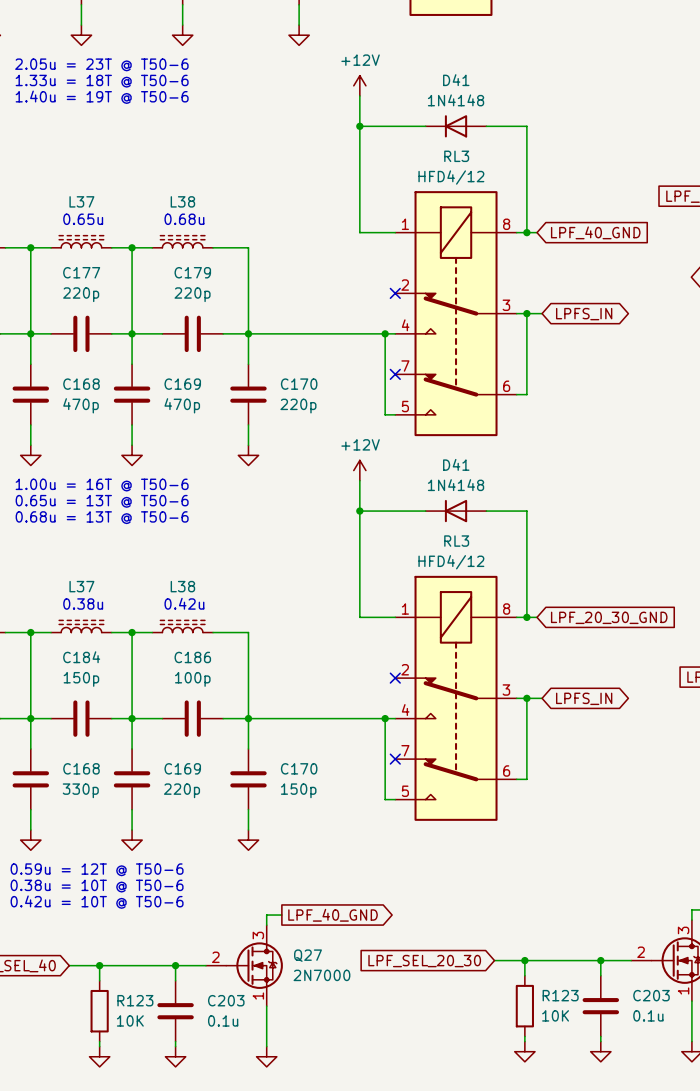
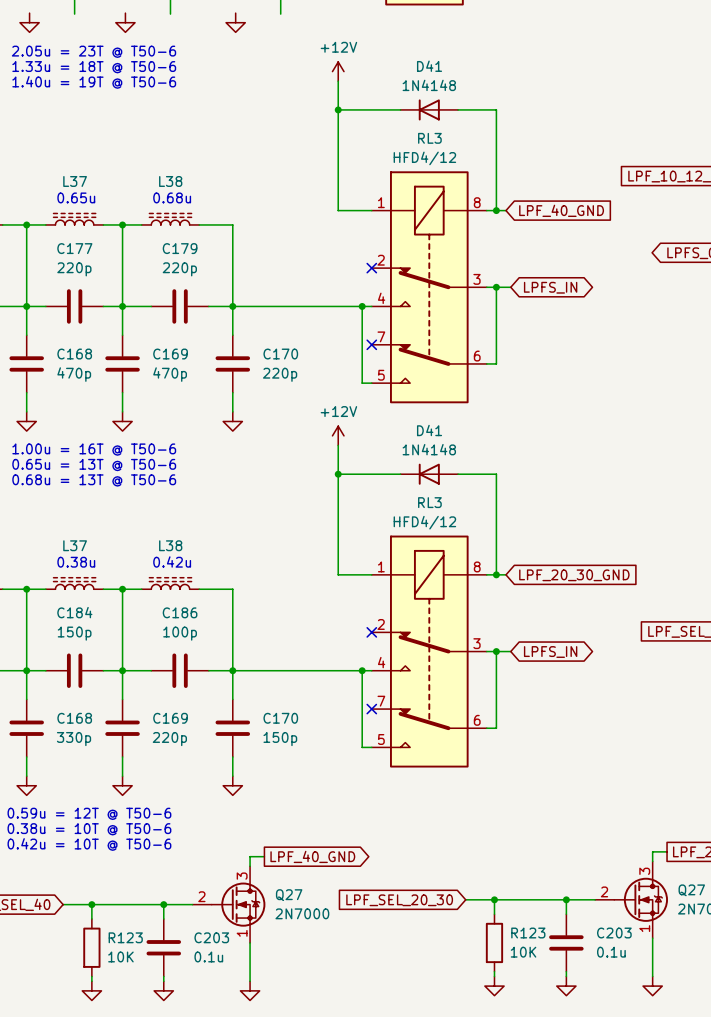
power symbol: none -> (29, 22)
power symbol: none -> (125, 22)
power symbol: none -> (235, 22)
power symbol: (81, 35) -> none
power symbol: (182, 35) -> none
power symbol: (299, 35) -> none

